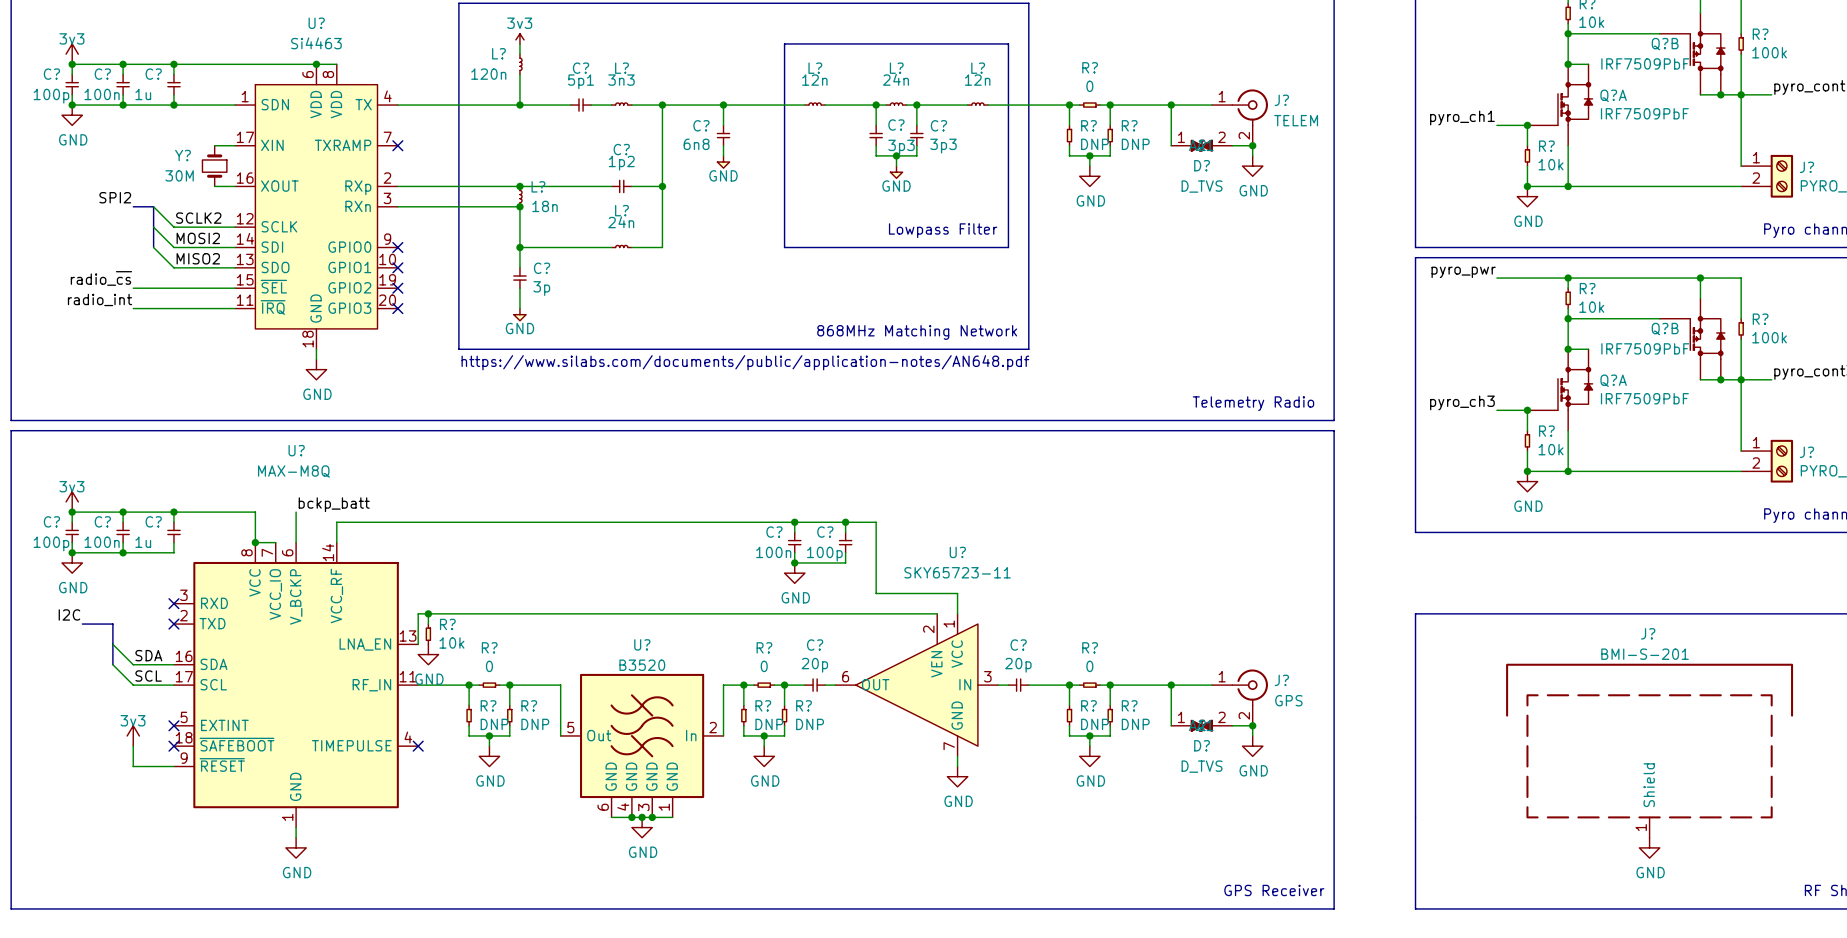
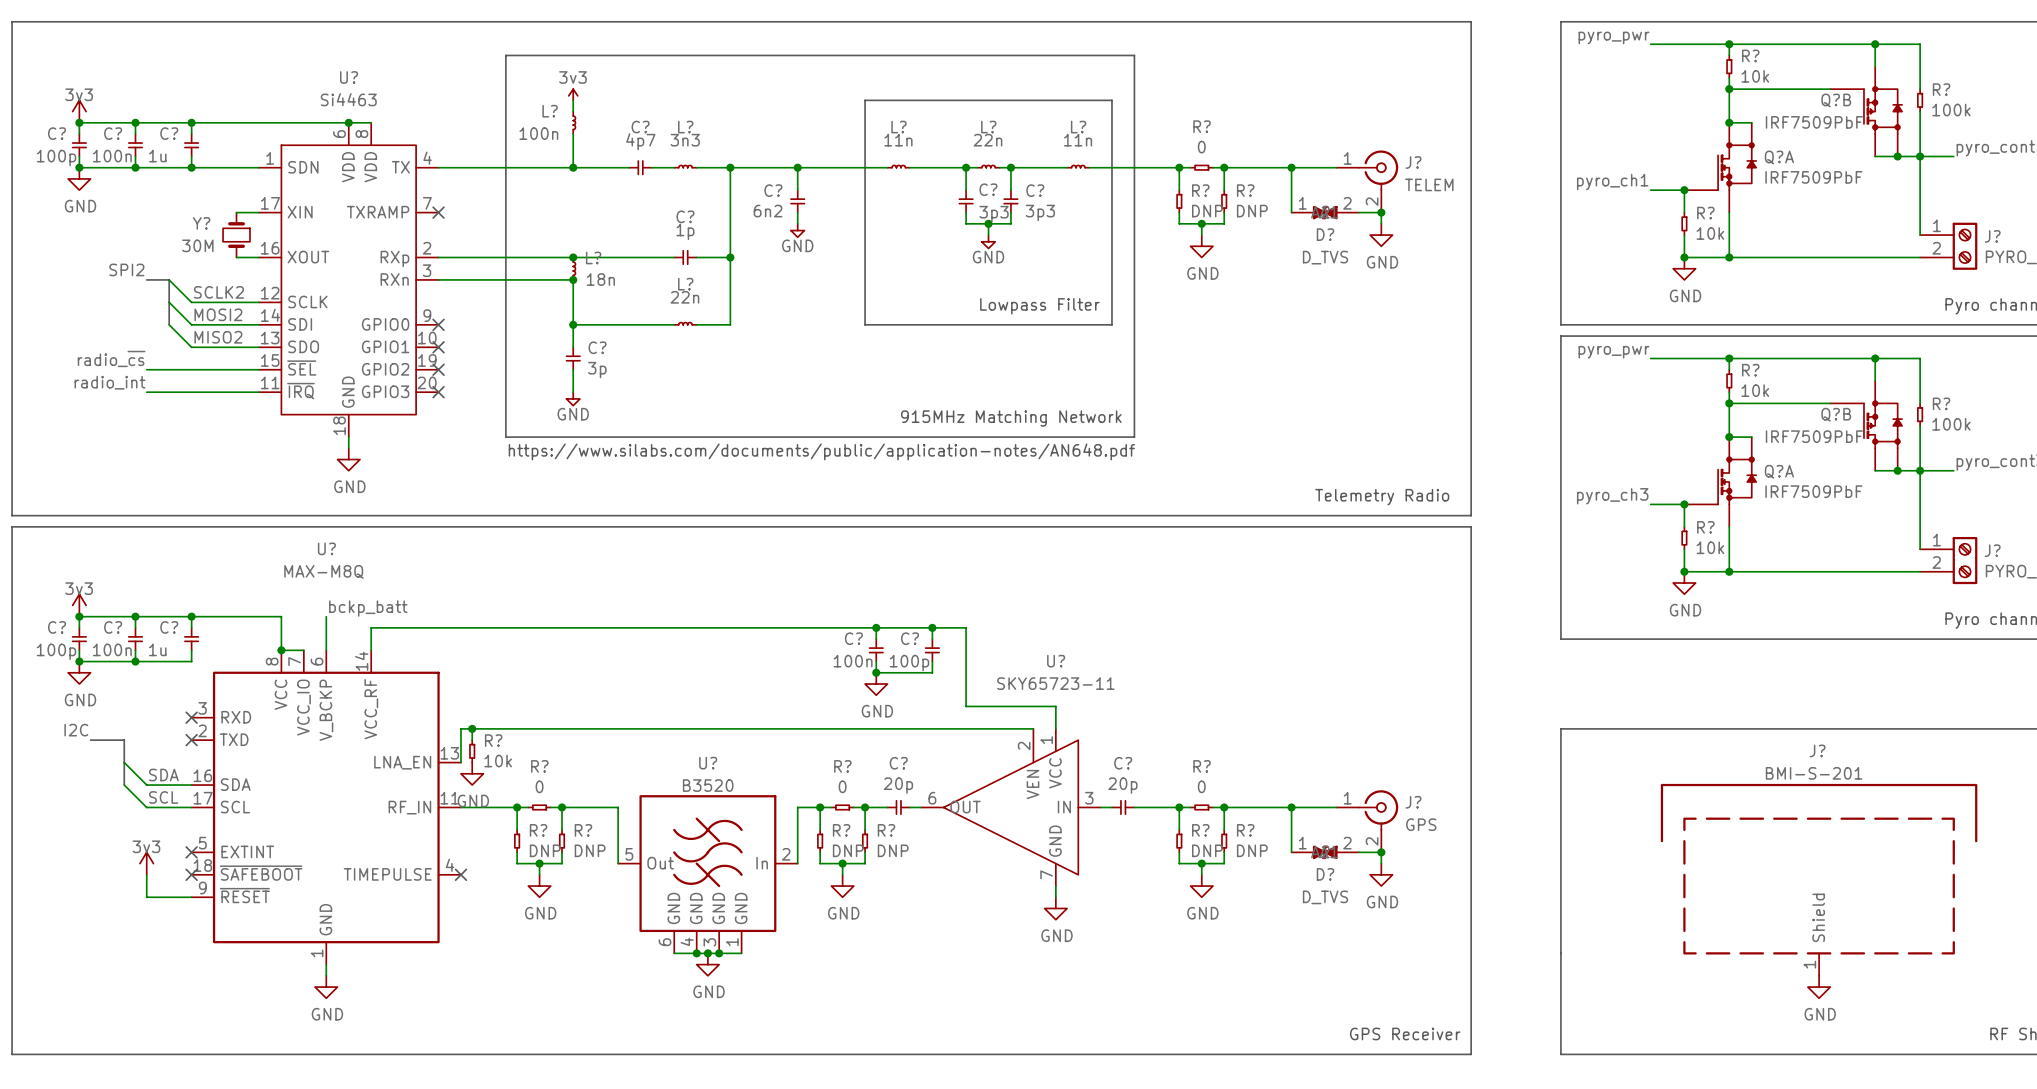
L? value: 120n (488, 74) -> 100n (538, 133)
L? value: 24n (896, 79) -> 22n (987, 140)
L? value: 12n (814, 80) -> 11n (898, 140)
L? value: 12n (977, 80) -> 11n (1078, 140)
C? value: 5p1 (581, 81) -> 4p7 (640, 141)
C? value: 6n8 (696, 144) -> 6n2 (768, 211)
C? value: 1p2 (621, 163) -> 1p (685, 231)
L? value: 24n (621, 222) -> 22n (684, 297)
text: 868MHz Matching Network (917, 332) -> 915MHz Matching Network (1011, 418)

